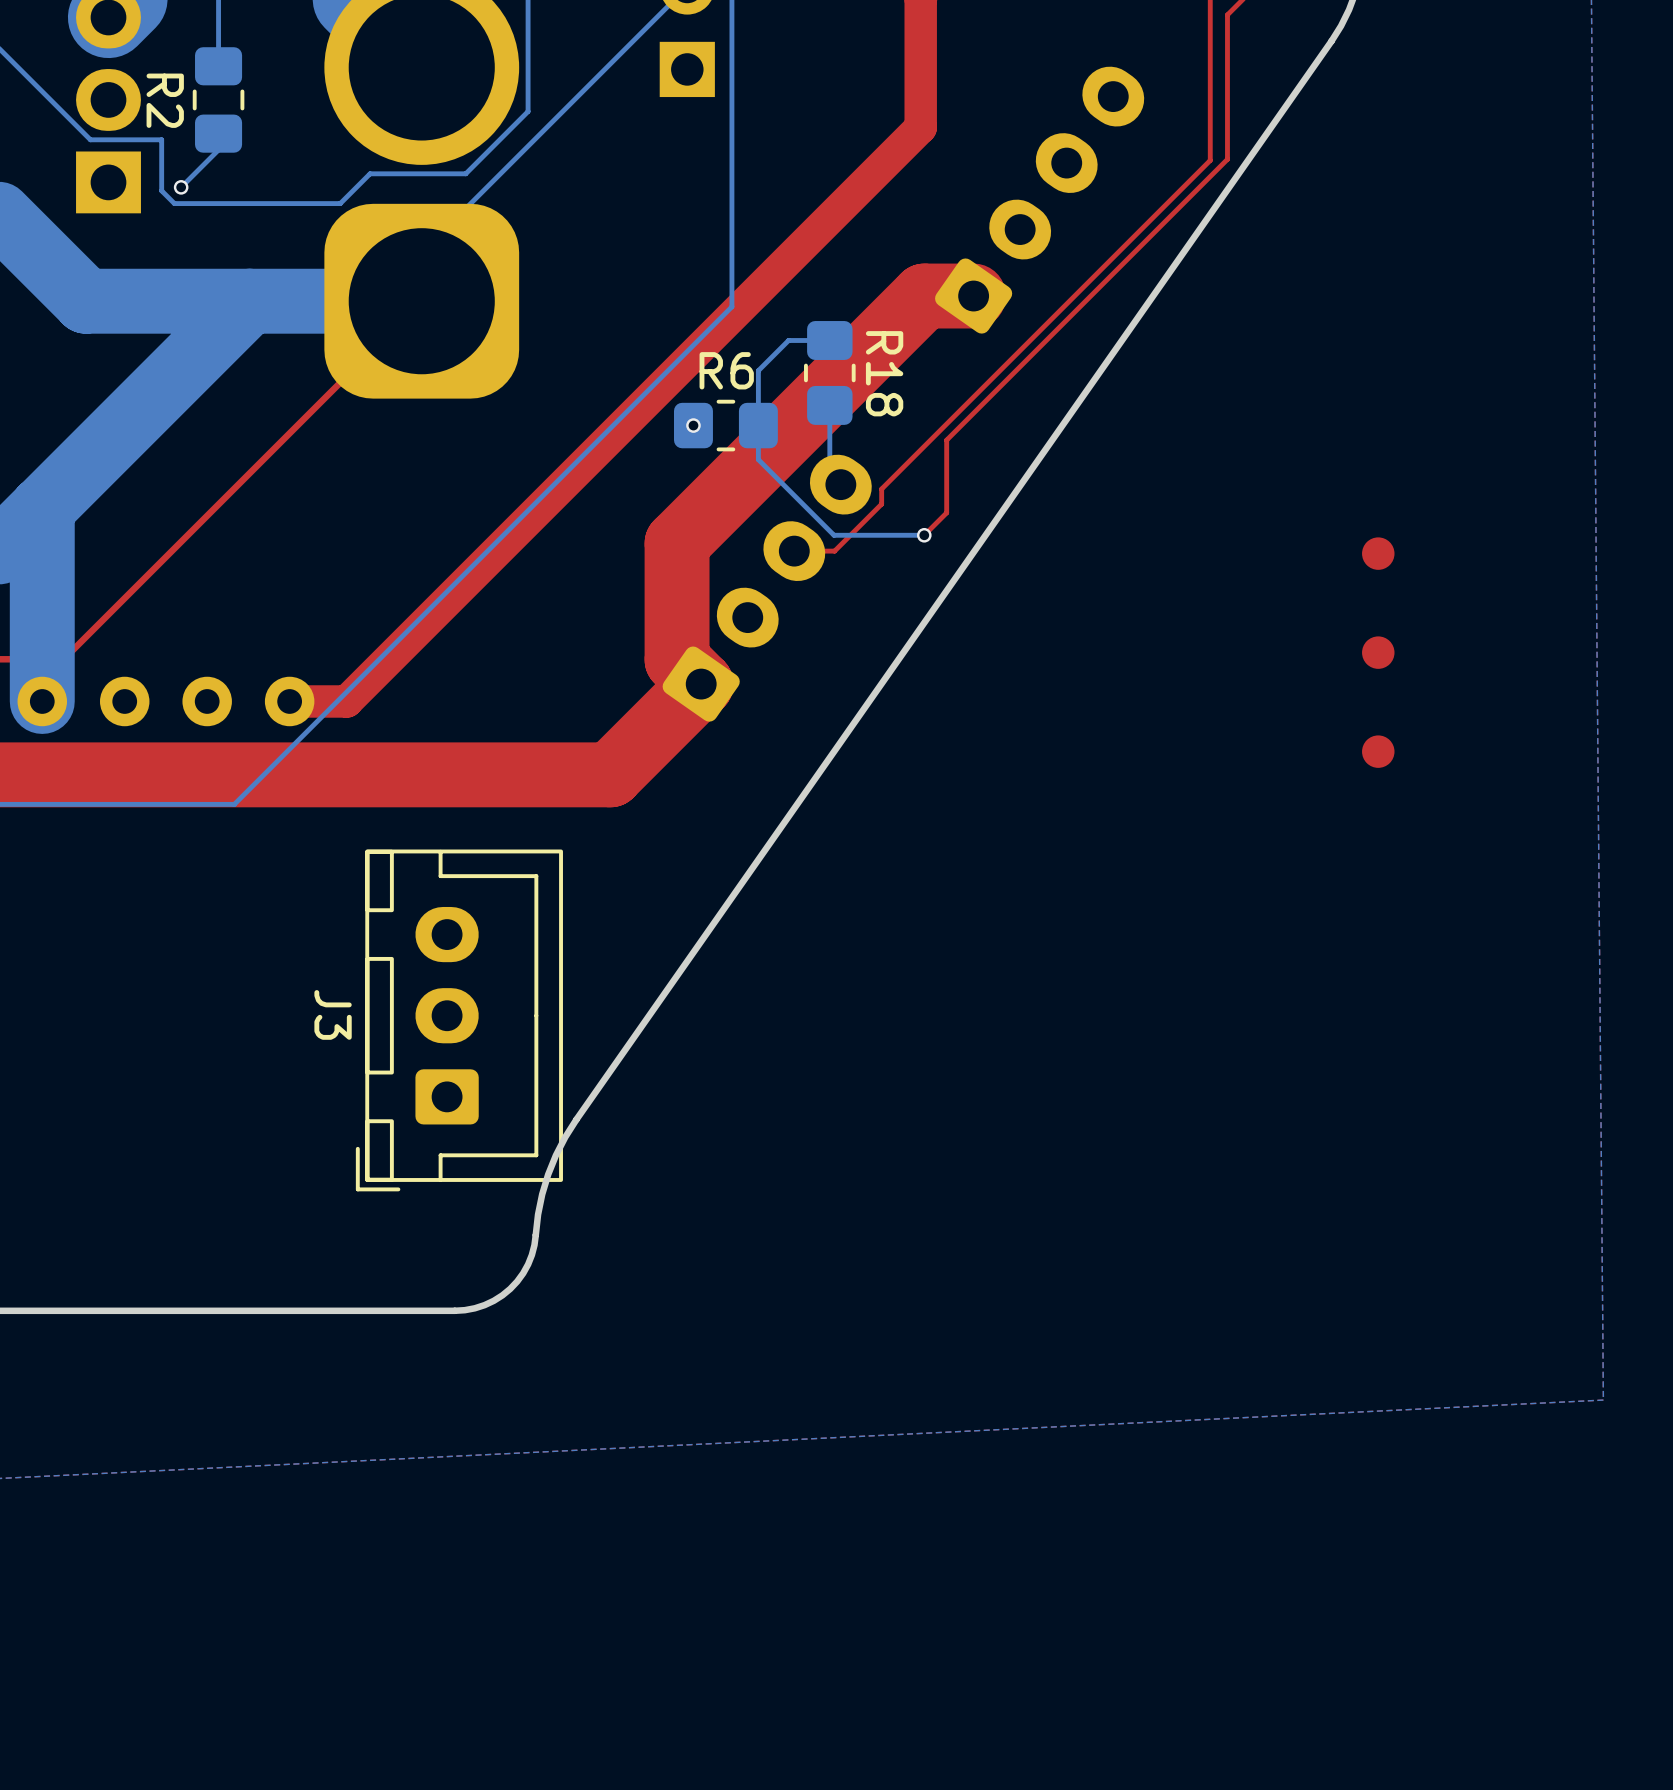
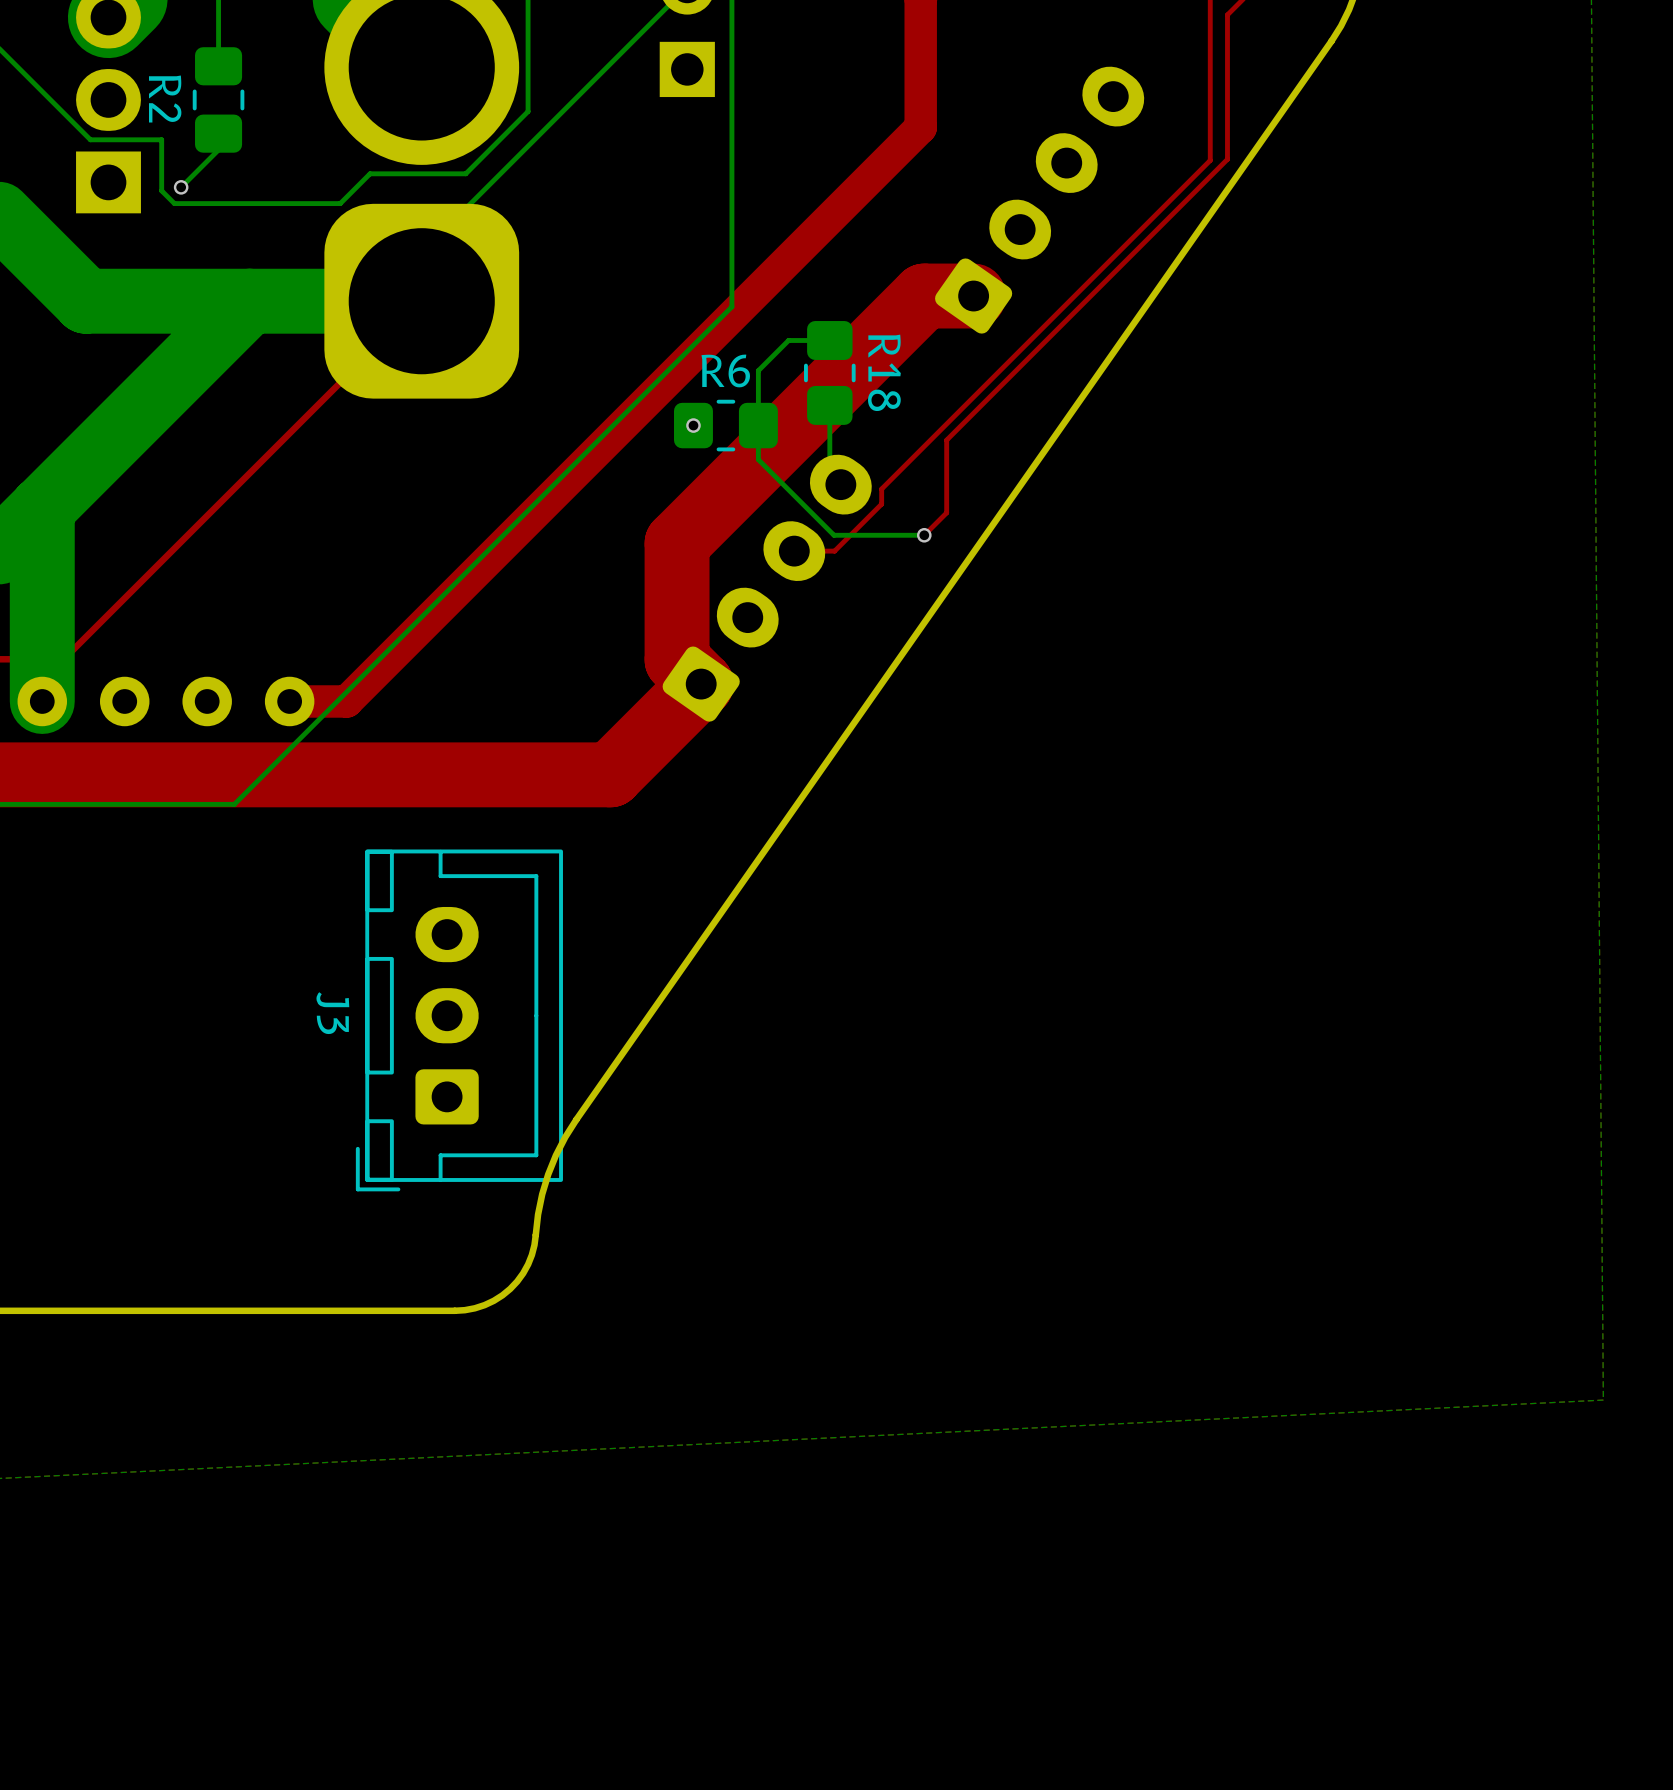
part: (1378, 553) -> none
part: (1378, 652) -> none
part: (1378, 751) -> none

